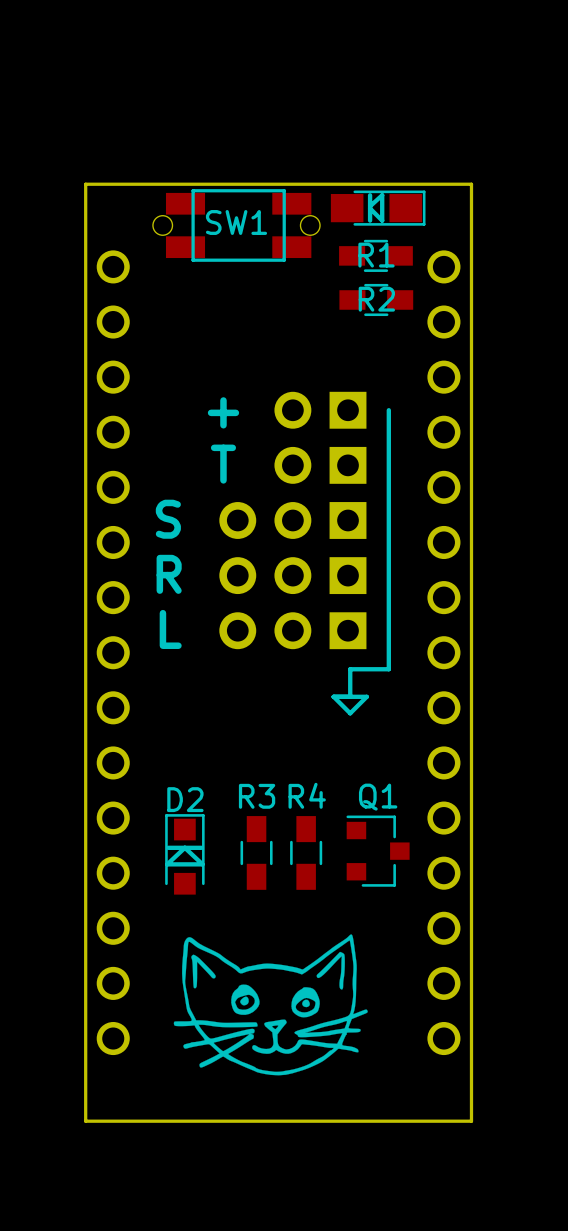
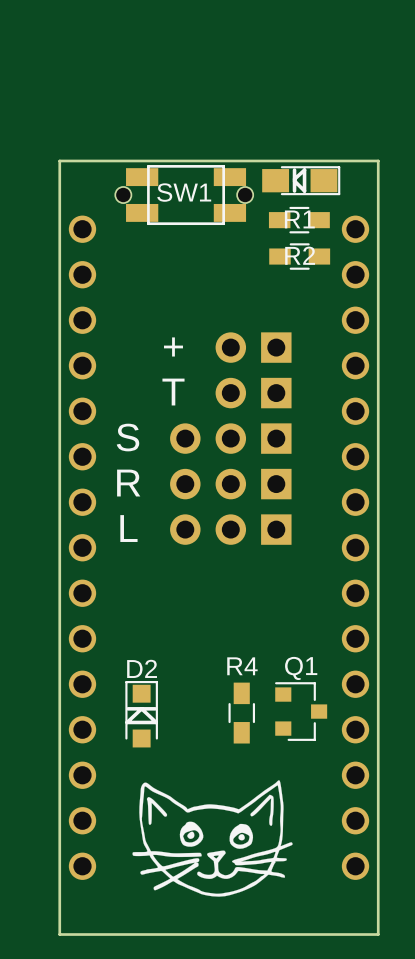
line: (388, 410) (388, 669) (350, 669) (350, 696) -> none
line: (333, 696) (350, 713) (366, 696) (333, 696) -> none
R3: (256, 852) -> none

